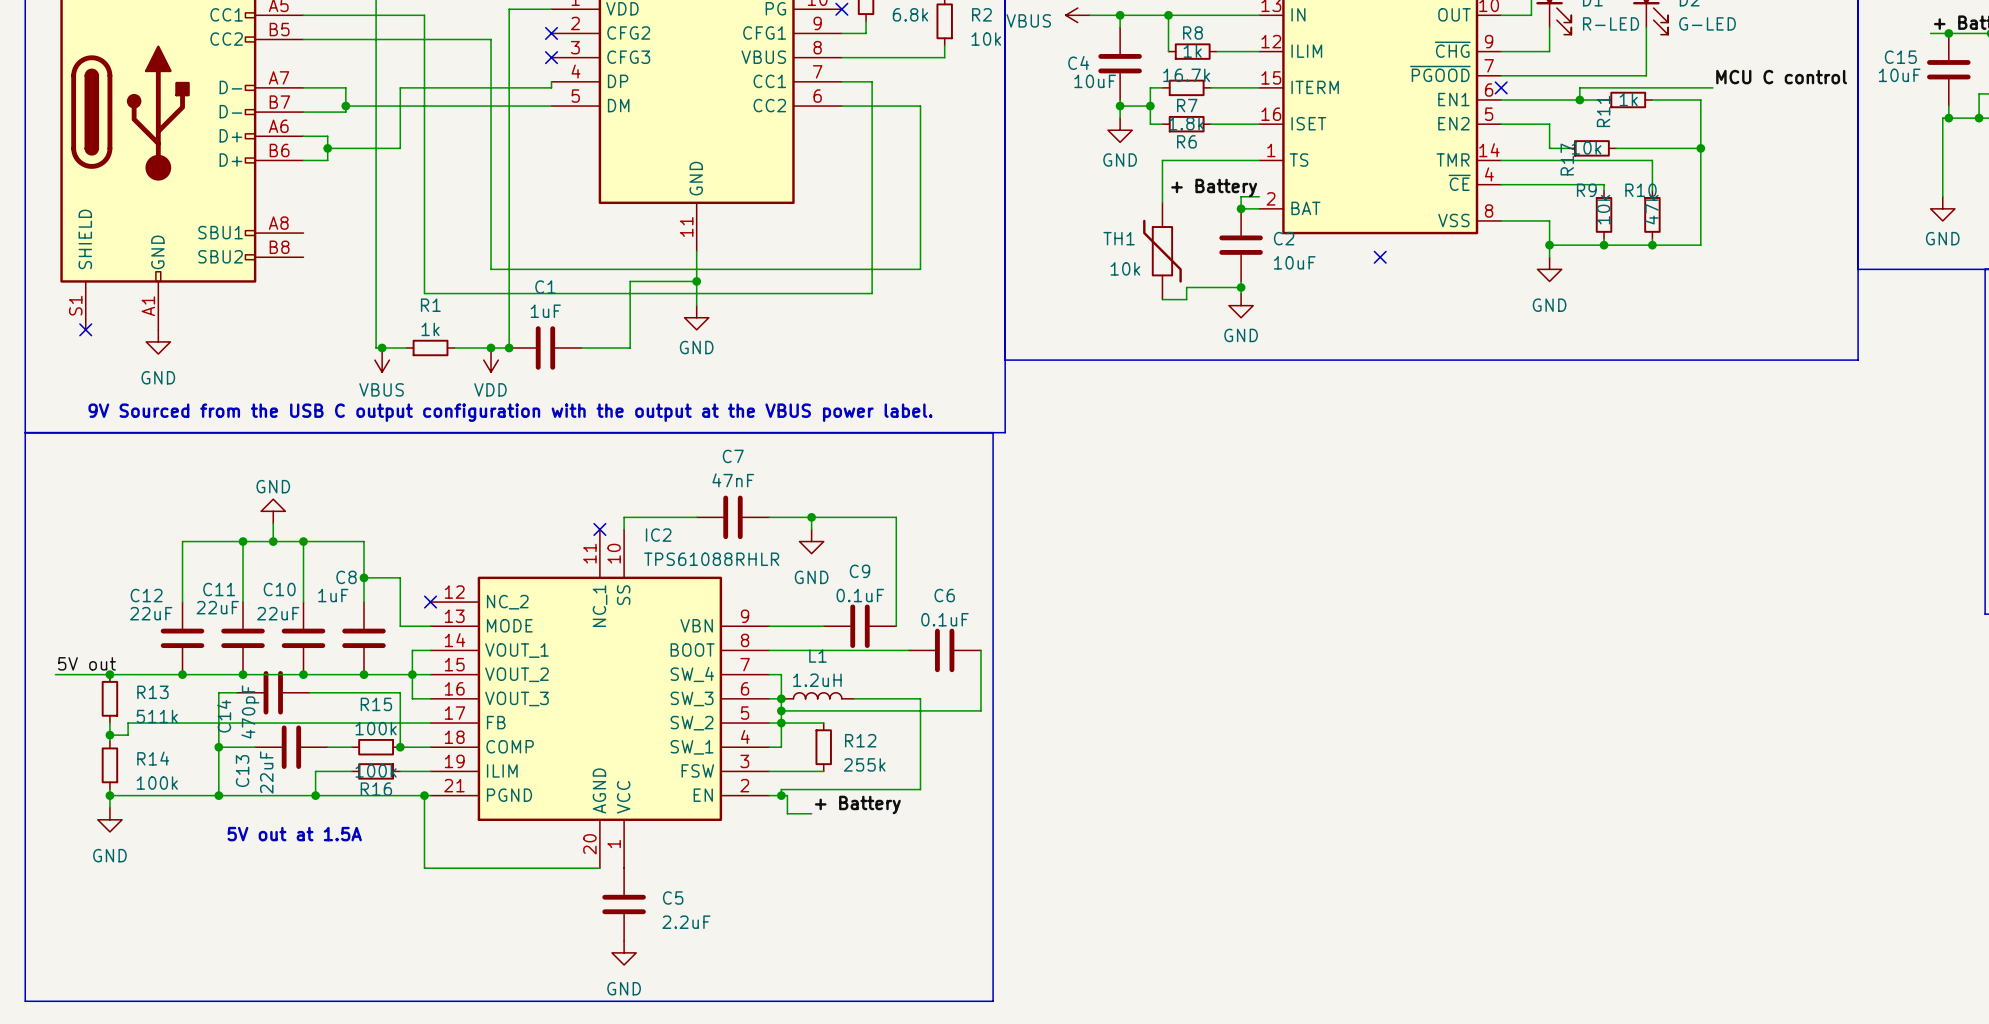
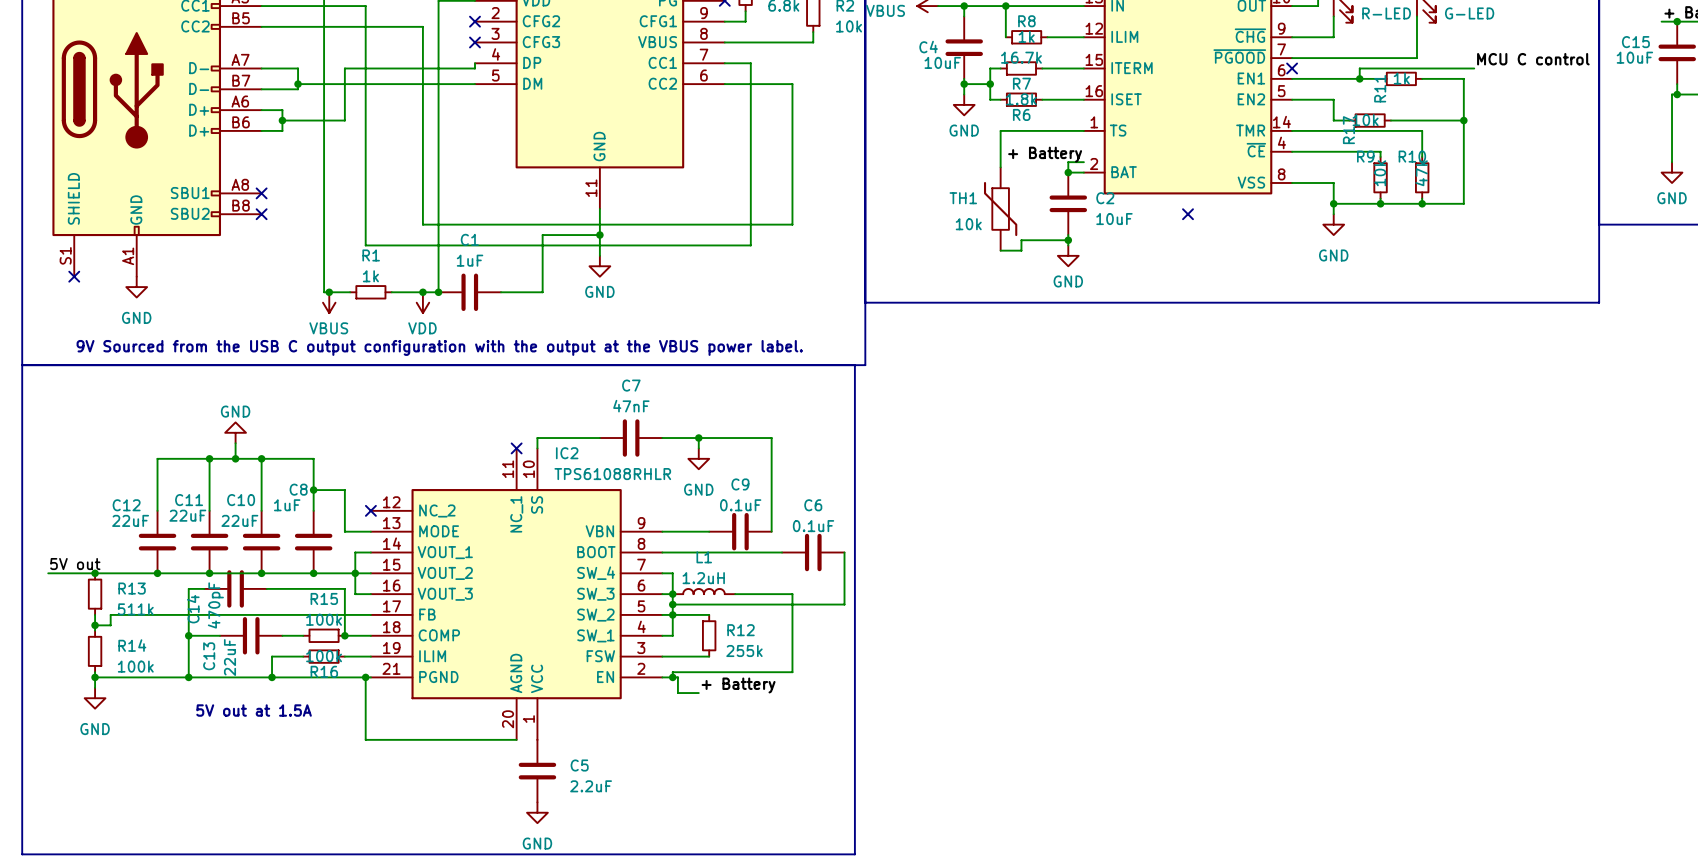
no-connect mark: none -> (261, 193)
no-connect mark: none -> (261, 214)

